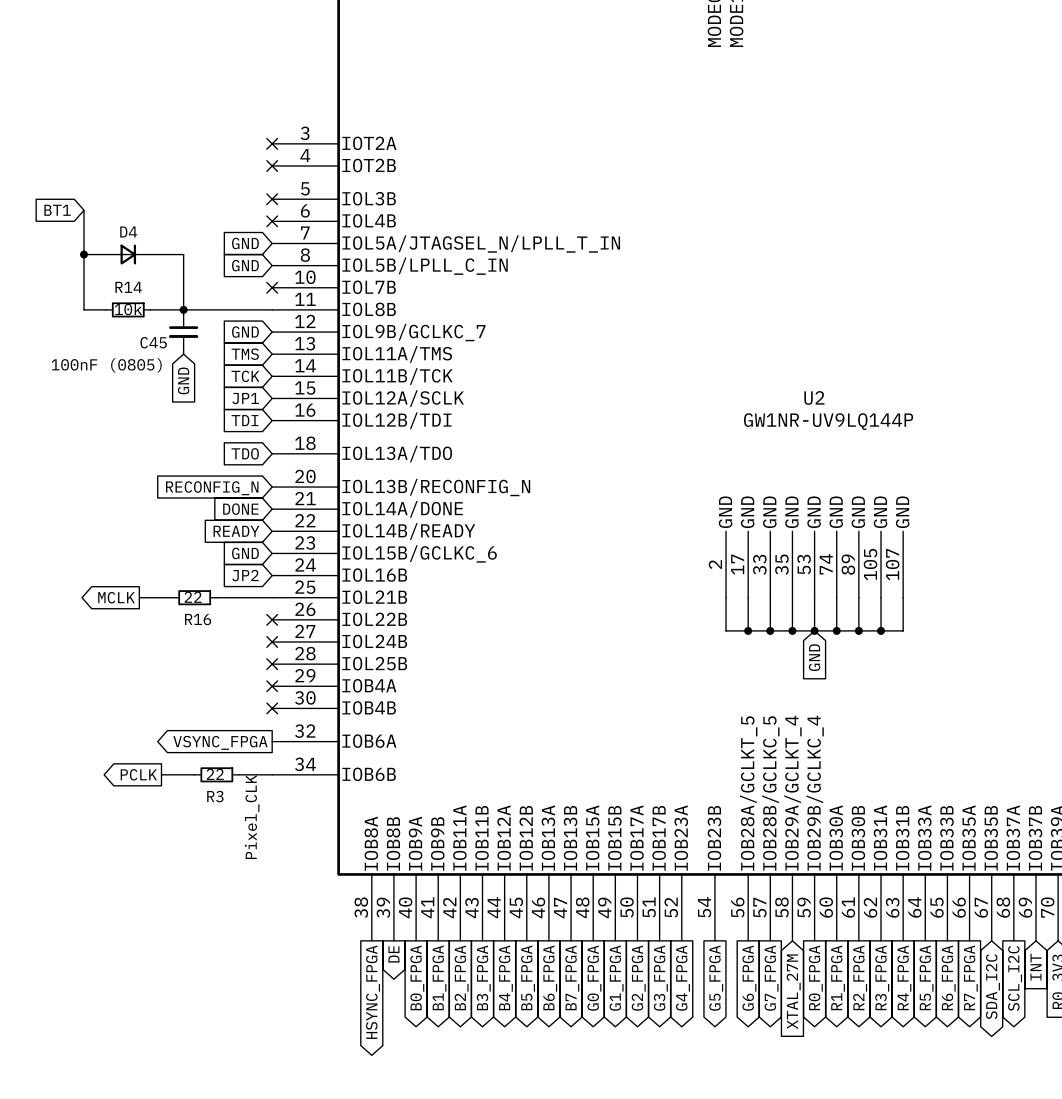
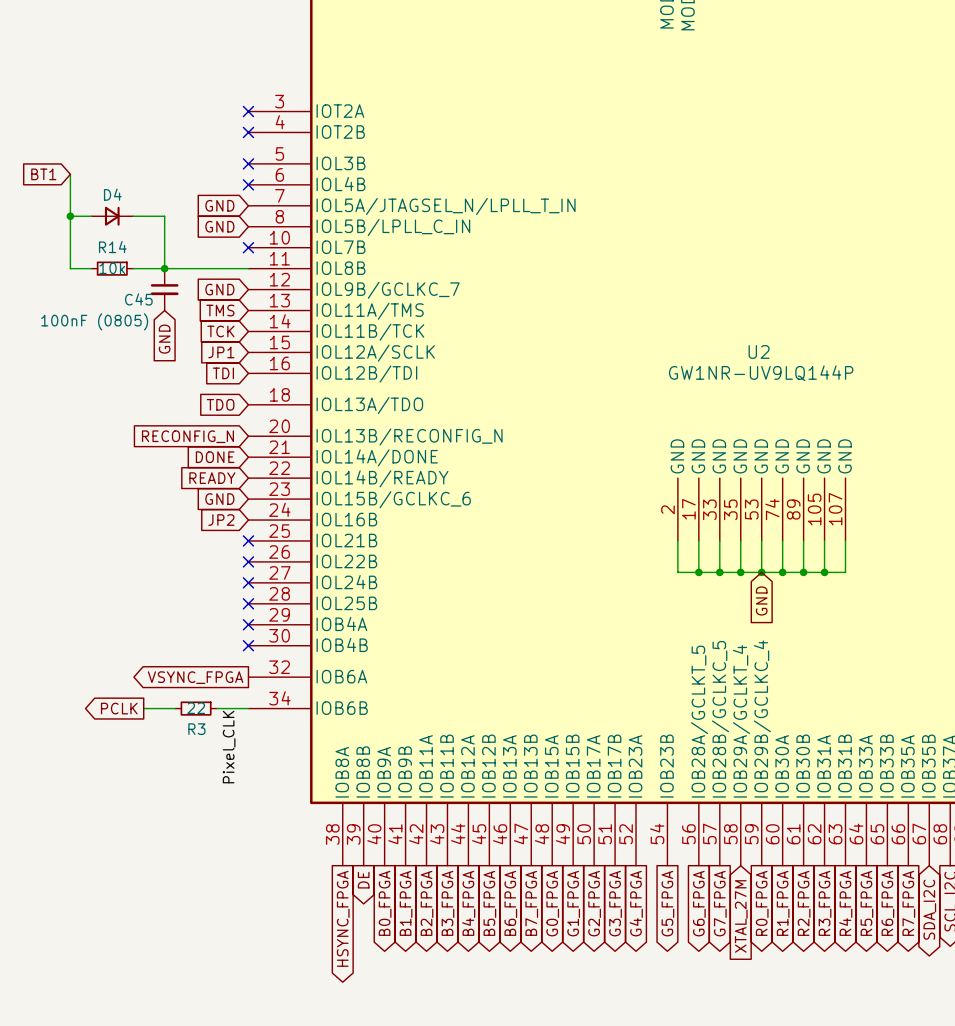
global label: MCLK (116, 597) -> none
wire: (139, 597) (172, 597) -> none
R16: 22 (194, 597) -> none
wire: (216, 597) (272, 597) -> none
no-connect mark: none -> (248, 540)

